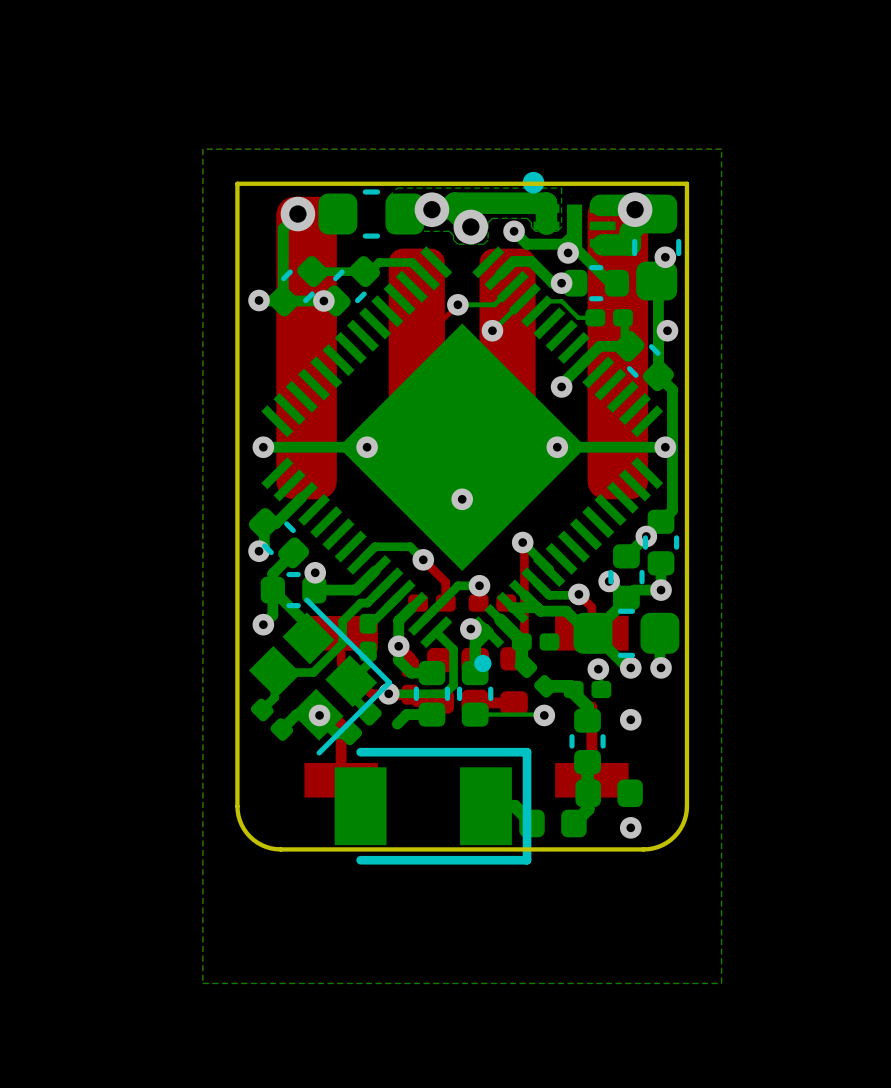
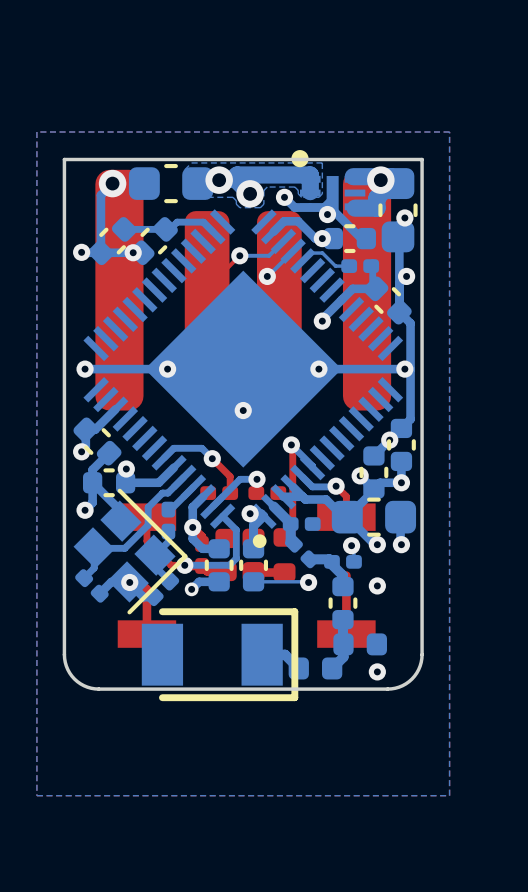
via: none -> (191, 589)

